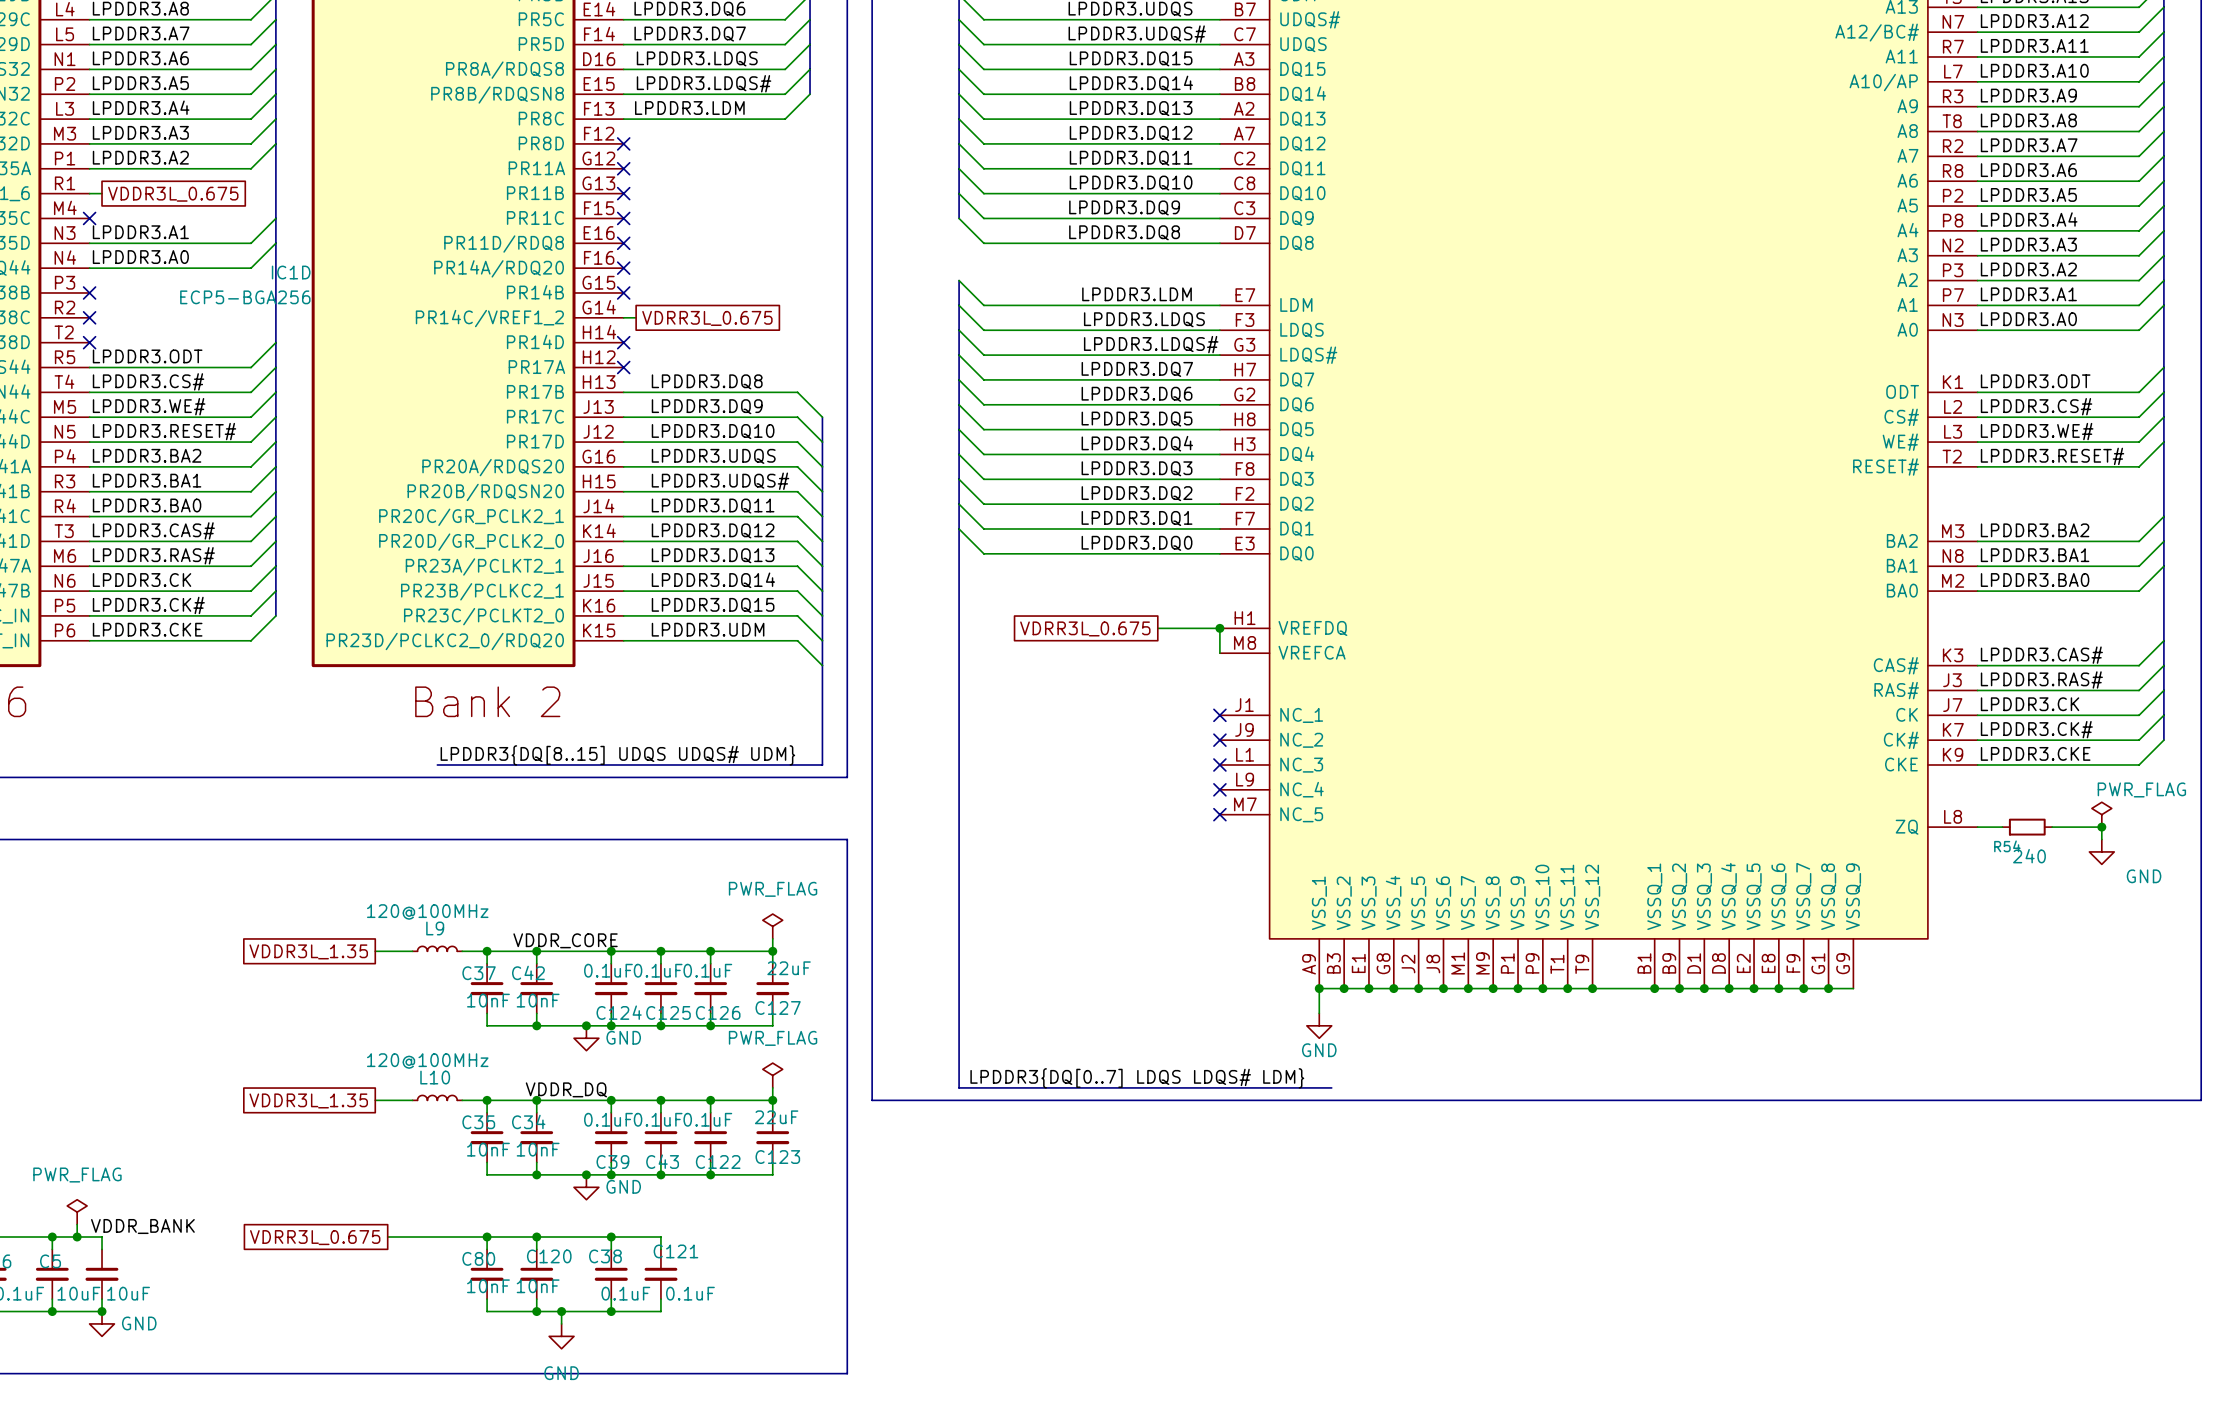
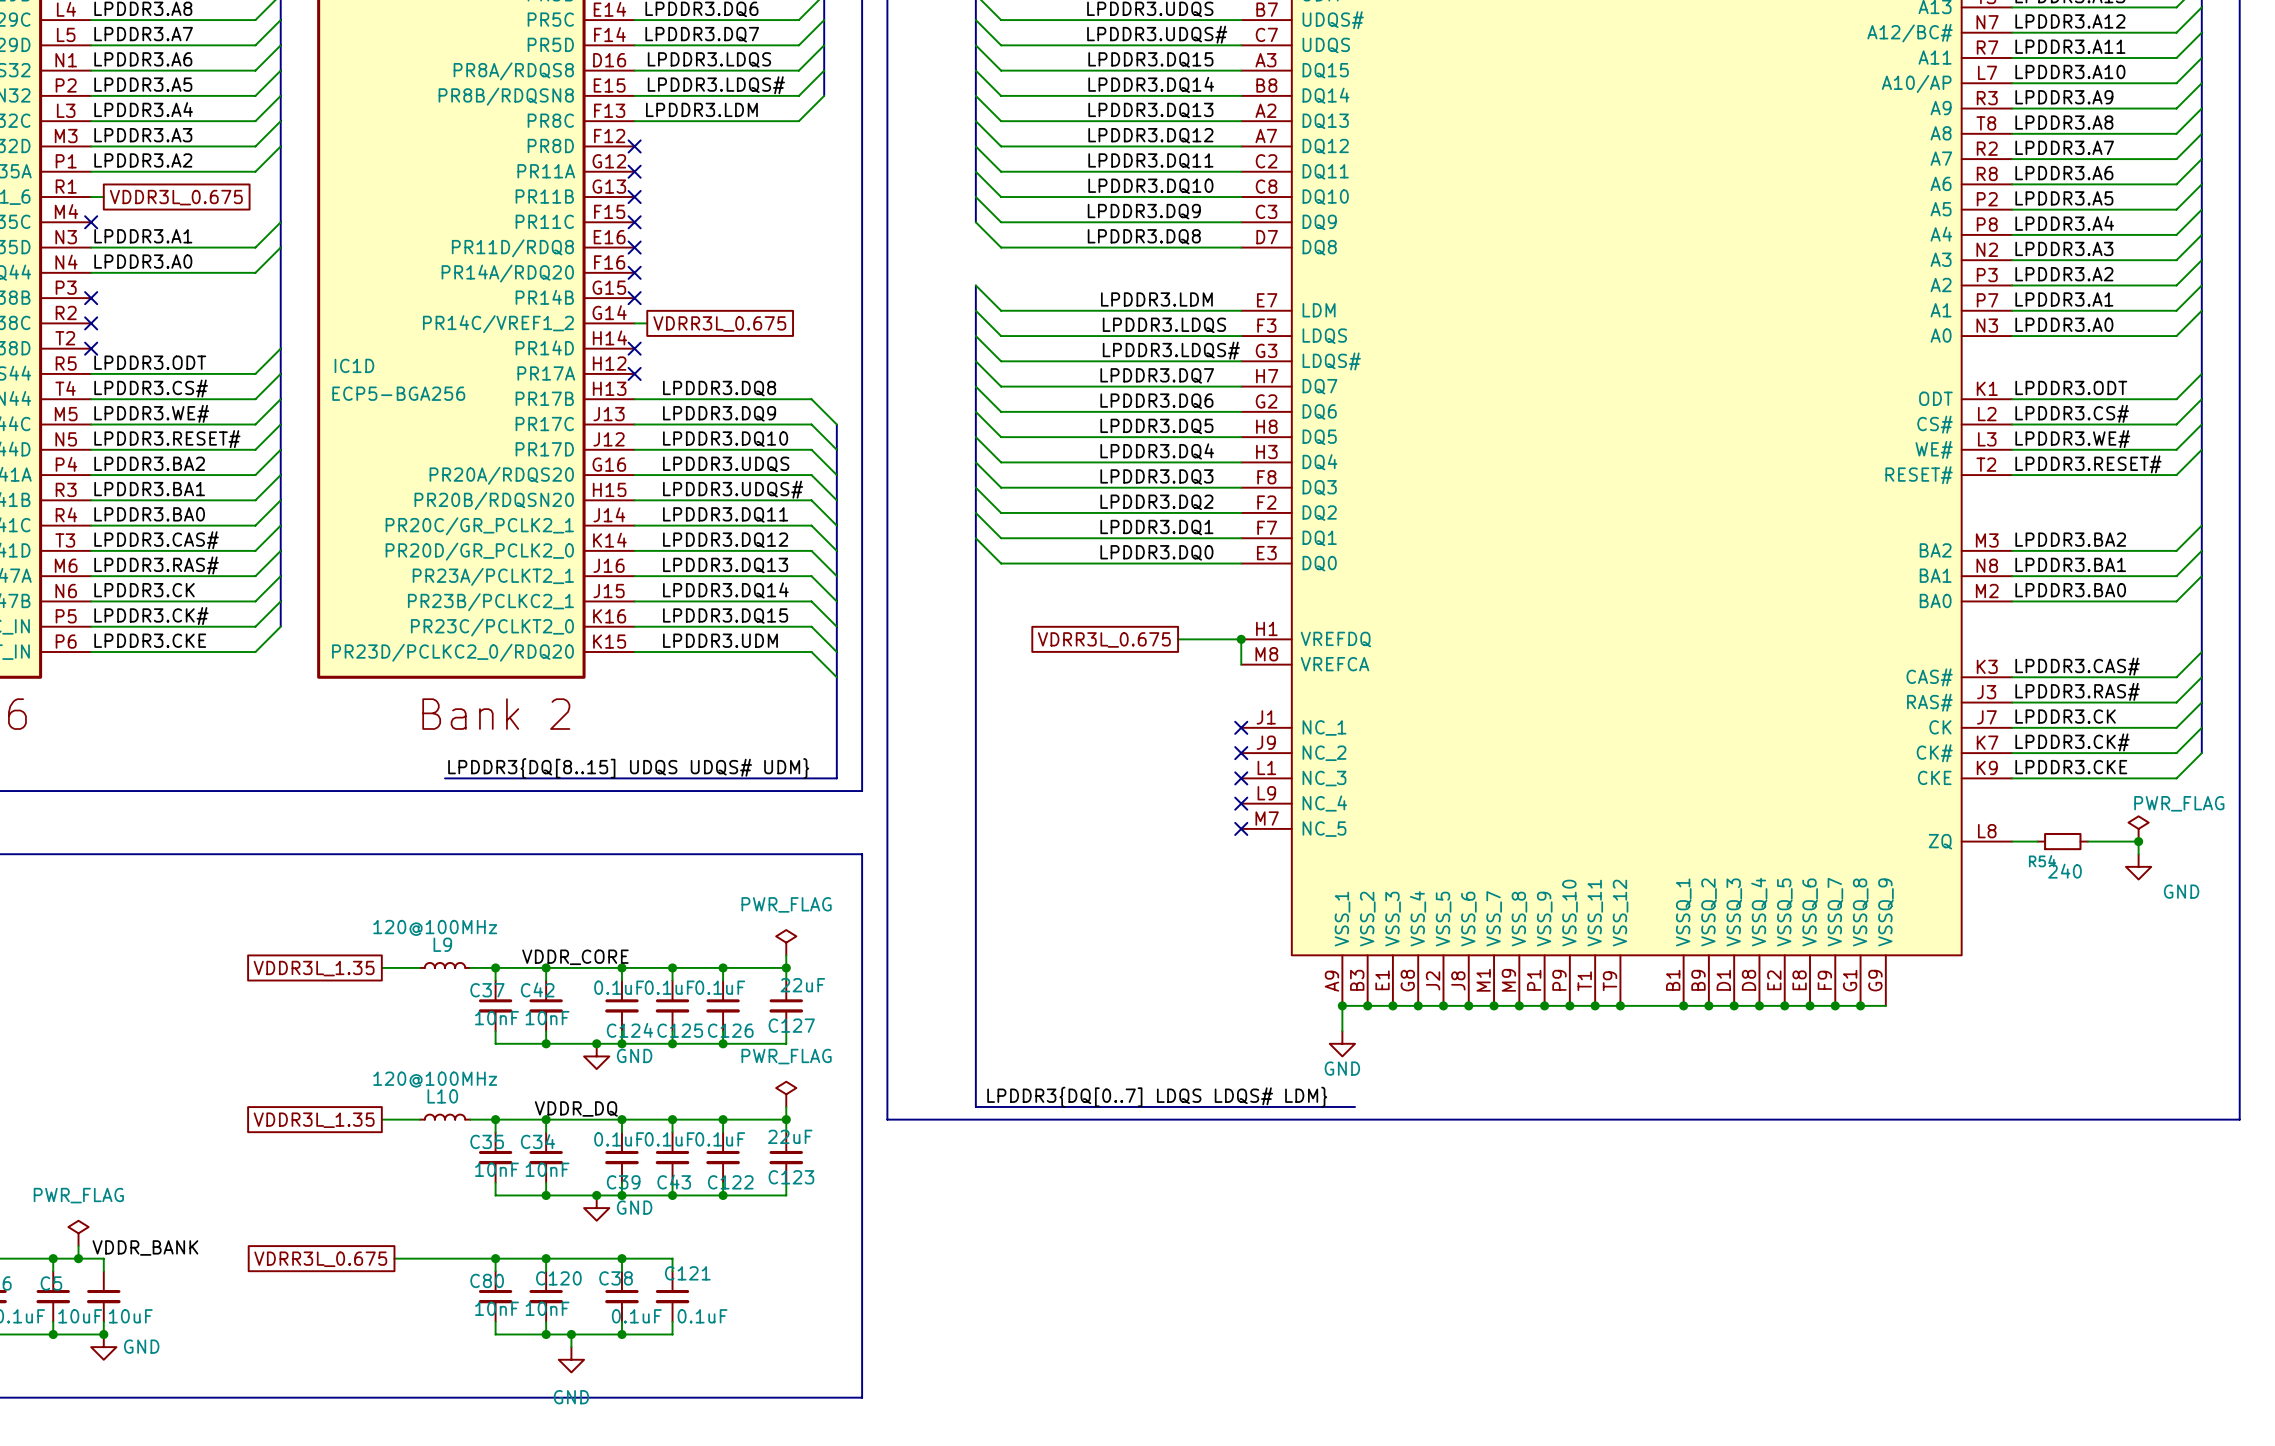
IC1D name position: IC1D (291, 272) -> IC1D (354, 365)
IC1D value position: ECP5-BGA256 (245, 297) -> ECP5-BGA256 (398, 393)

